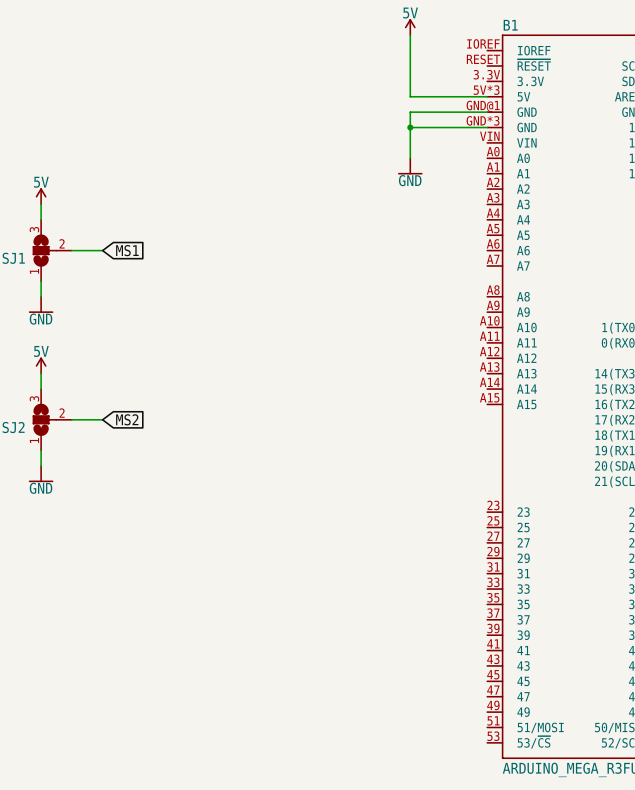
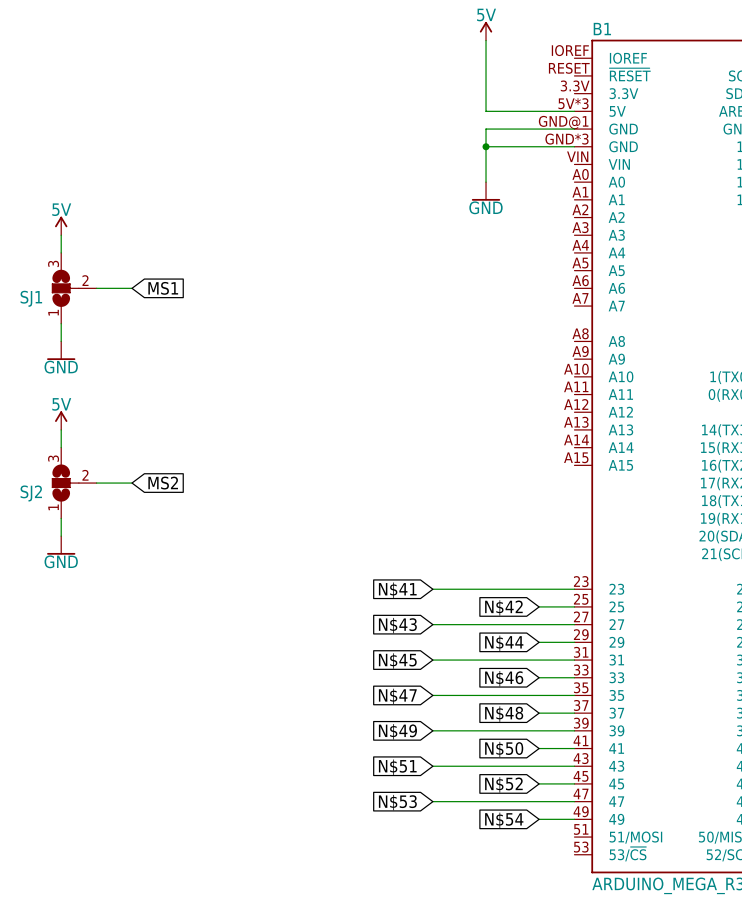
global label: none -> N$41 (397, 590)
wire: none -> (432, 589) (574, 589)
wire: none -> (539, 606) (574, 606)
global label: none -> N$42 (503, 607)
wire: none -> (432, 624) (574, 624)
global label: none -> N$43 (397, 625)
wire: none -> (539, 642) (574, 642)
global label: none -> N$44 (504, 643)
wire: none -> (432, 660) (574, 660)
global label: none -> N$45 (397, 661)
global label: none -> N$46 (504, 678)
wire: none -> (539, 677) (574, 677)
wire: none -> (432, 695) (574, 695)
global label: none -> N$47 (397, 696)
wire: none -> (539, 713) (574, 713)
global label: none -> N$48 (504, 714)
wire: none -> (432, 730) (574, 730)
global label: none -> N$49 (397, 731)
wire: none -> (539, 748) (574, 748)
global label: none -> N$50 (504, 749)
wire: none -> (432, 766) (574, 766)
global label: none -> N$51 (397, 767)
wire: none -> (539, 783) (574, 783)
global label: none -> N$52 (503, 784)
wire: none -> (432, 801) (574, 801)
global label: none -> N$53 (397, 802)
global label: none -> N$54 (504, 820)
wire: none -> (539, 819) (574, 819)

